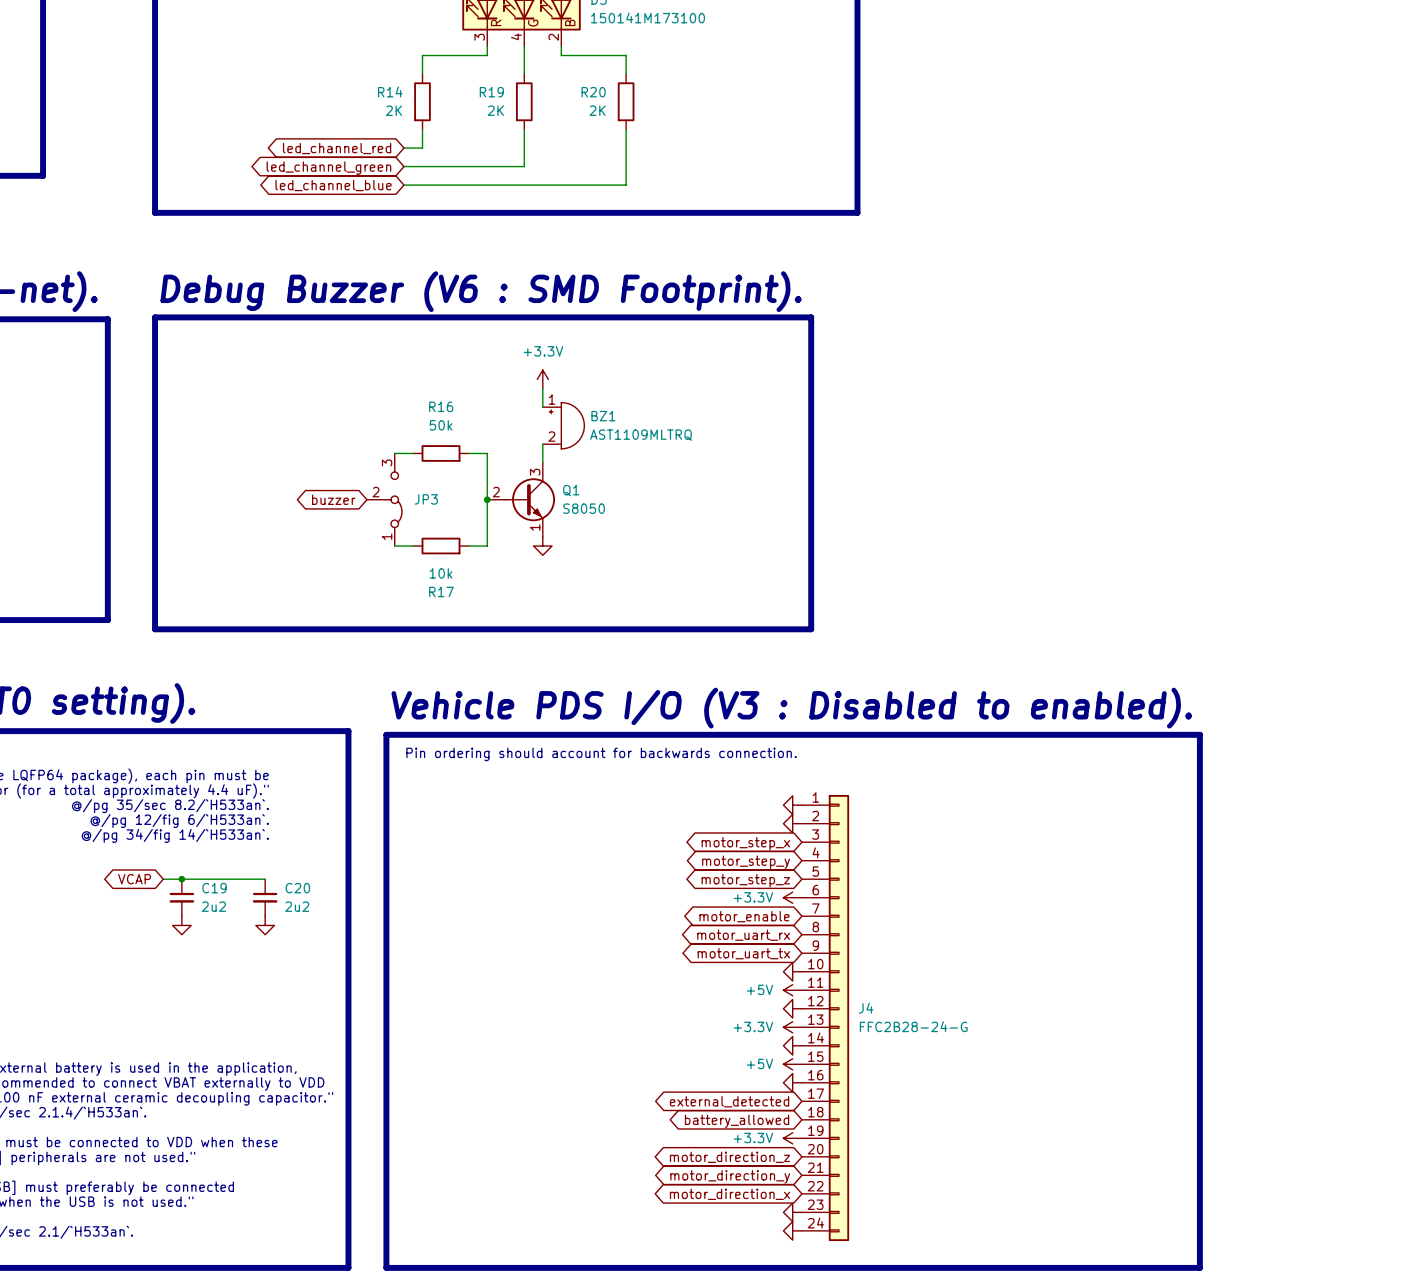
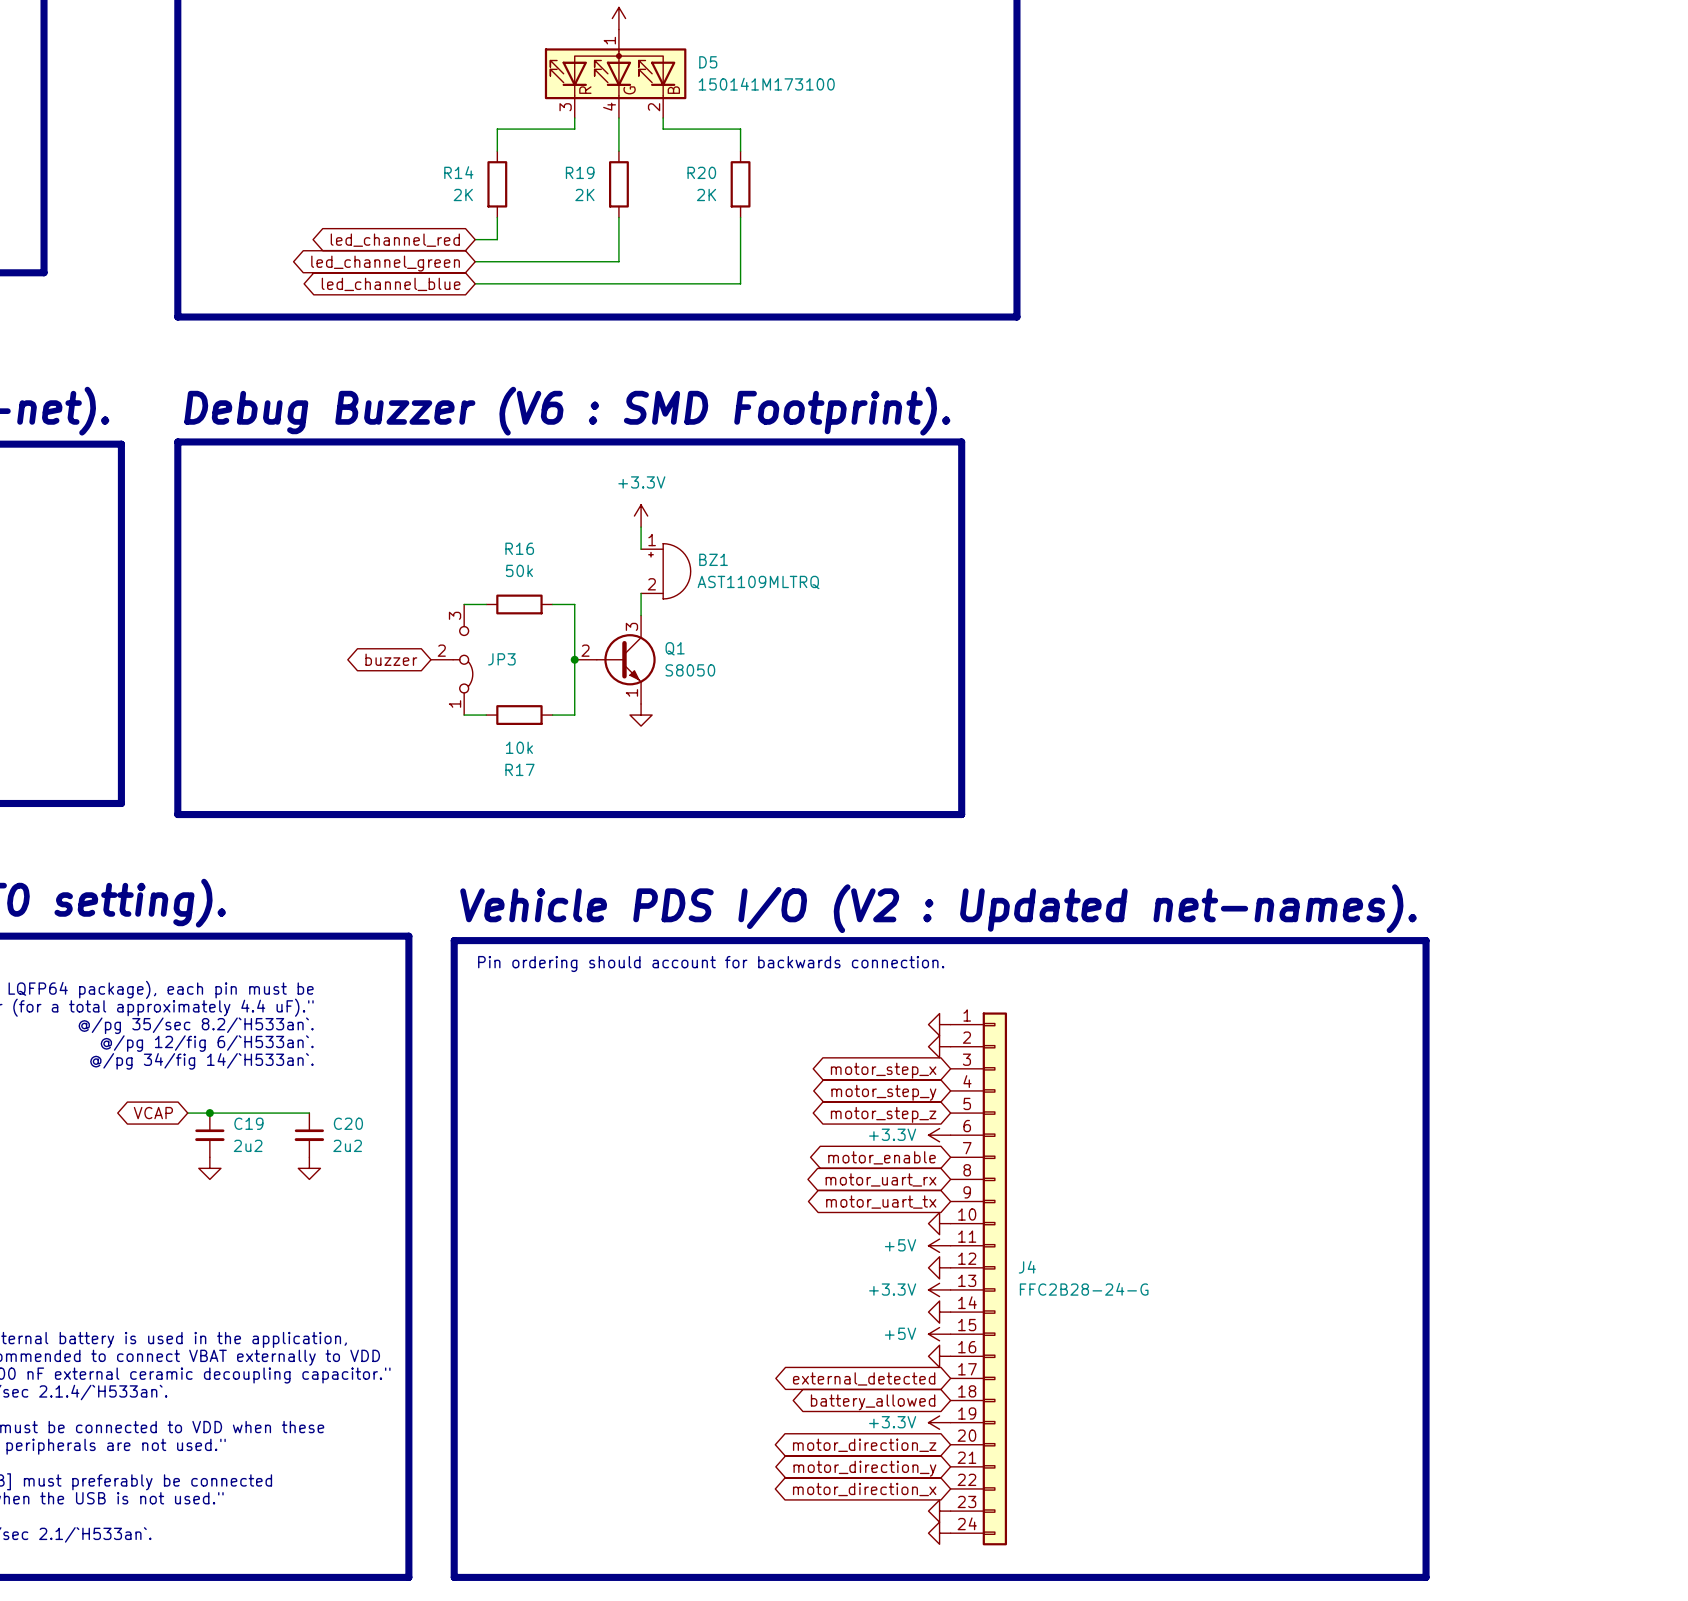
text: Vehicle PDS I/O (V3 : Disabled to enabled). (791, 708) -> Vehicle PDS I/O (V2 : Updated net-names). (938, 908)

